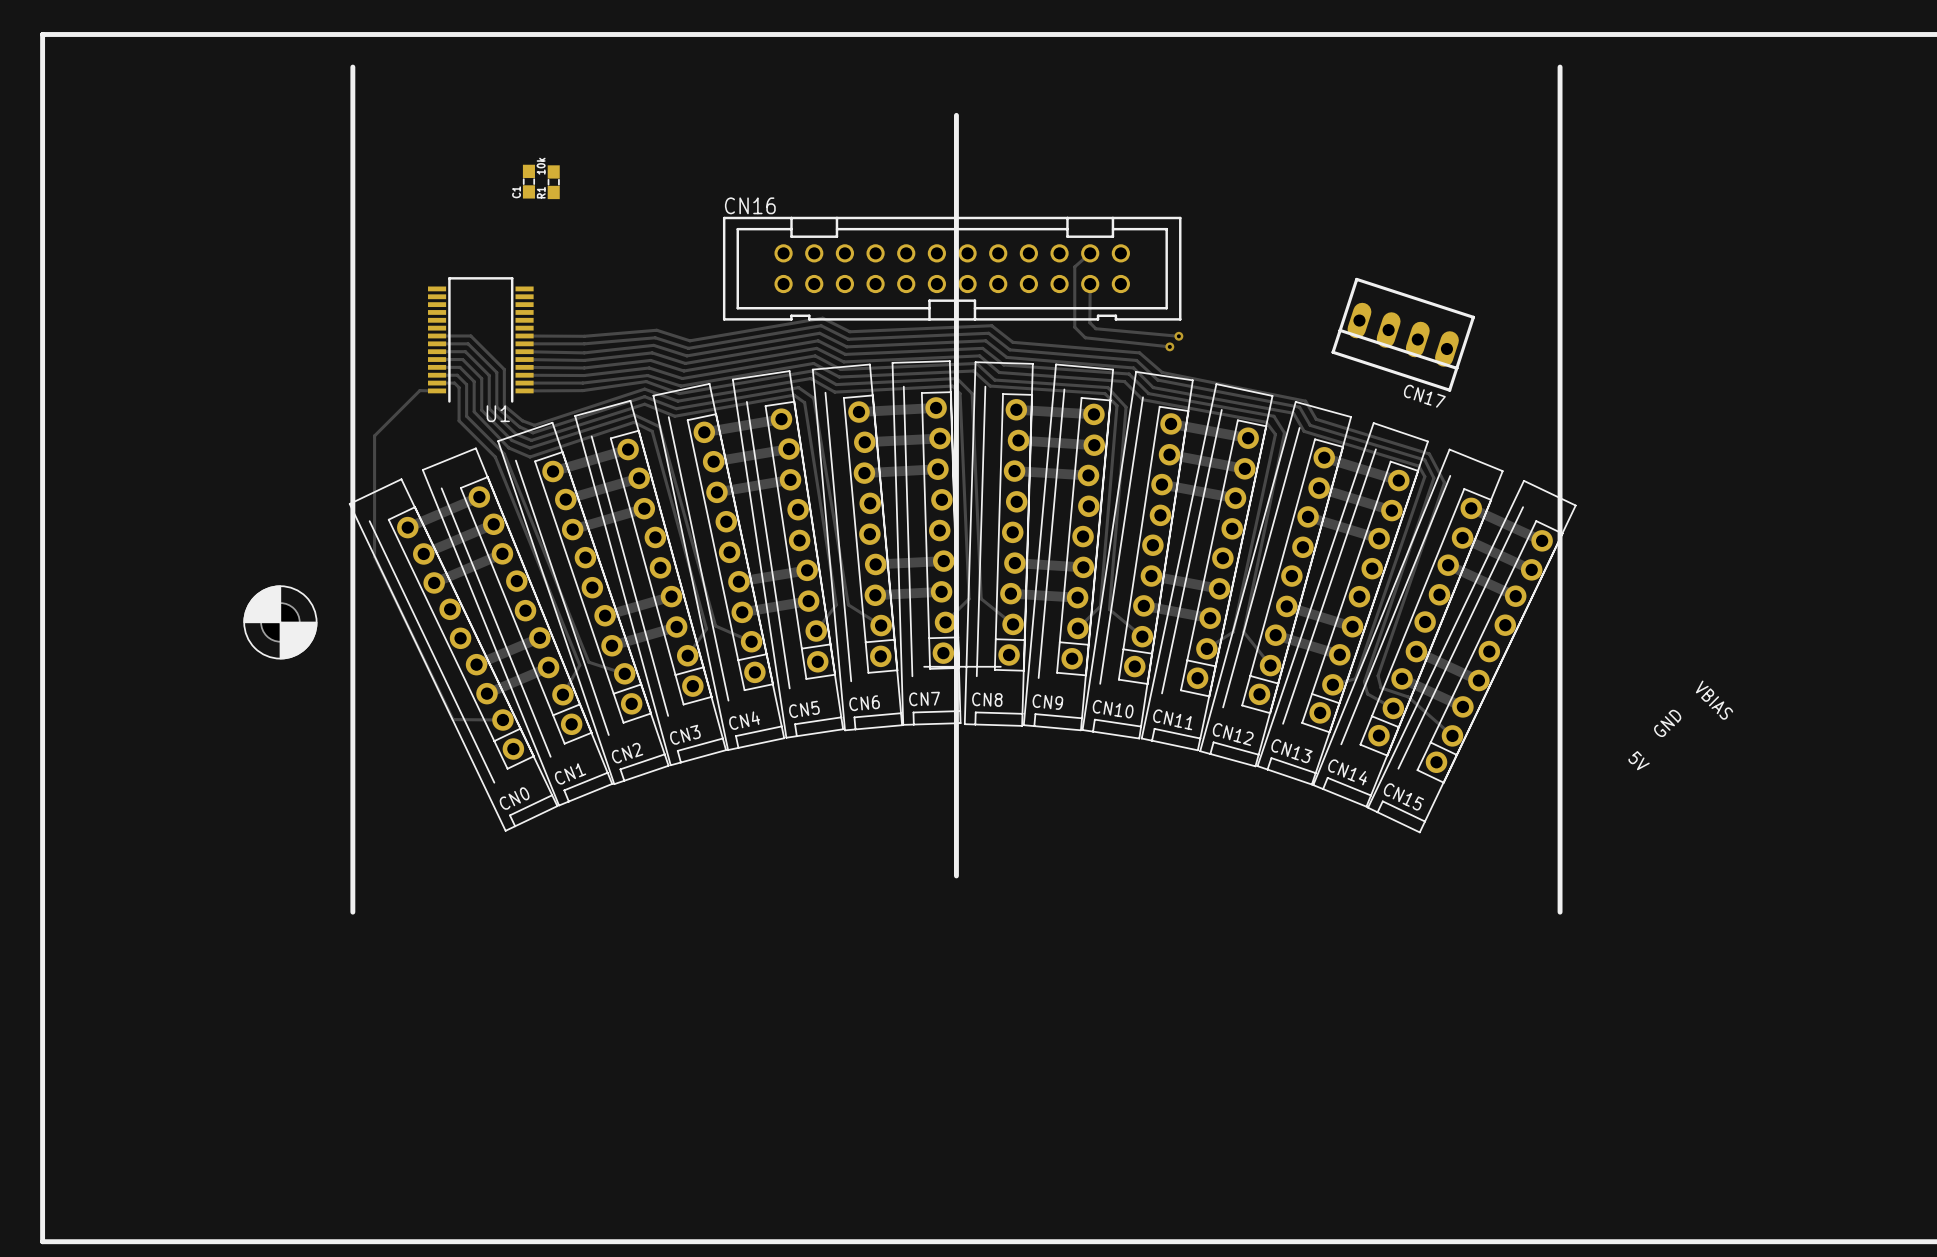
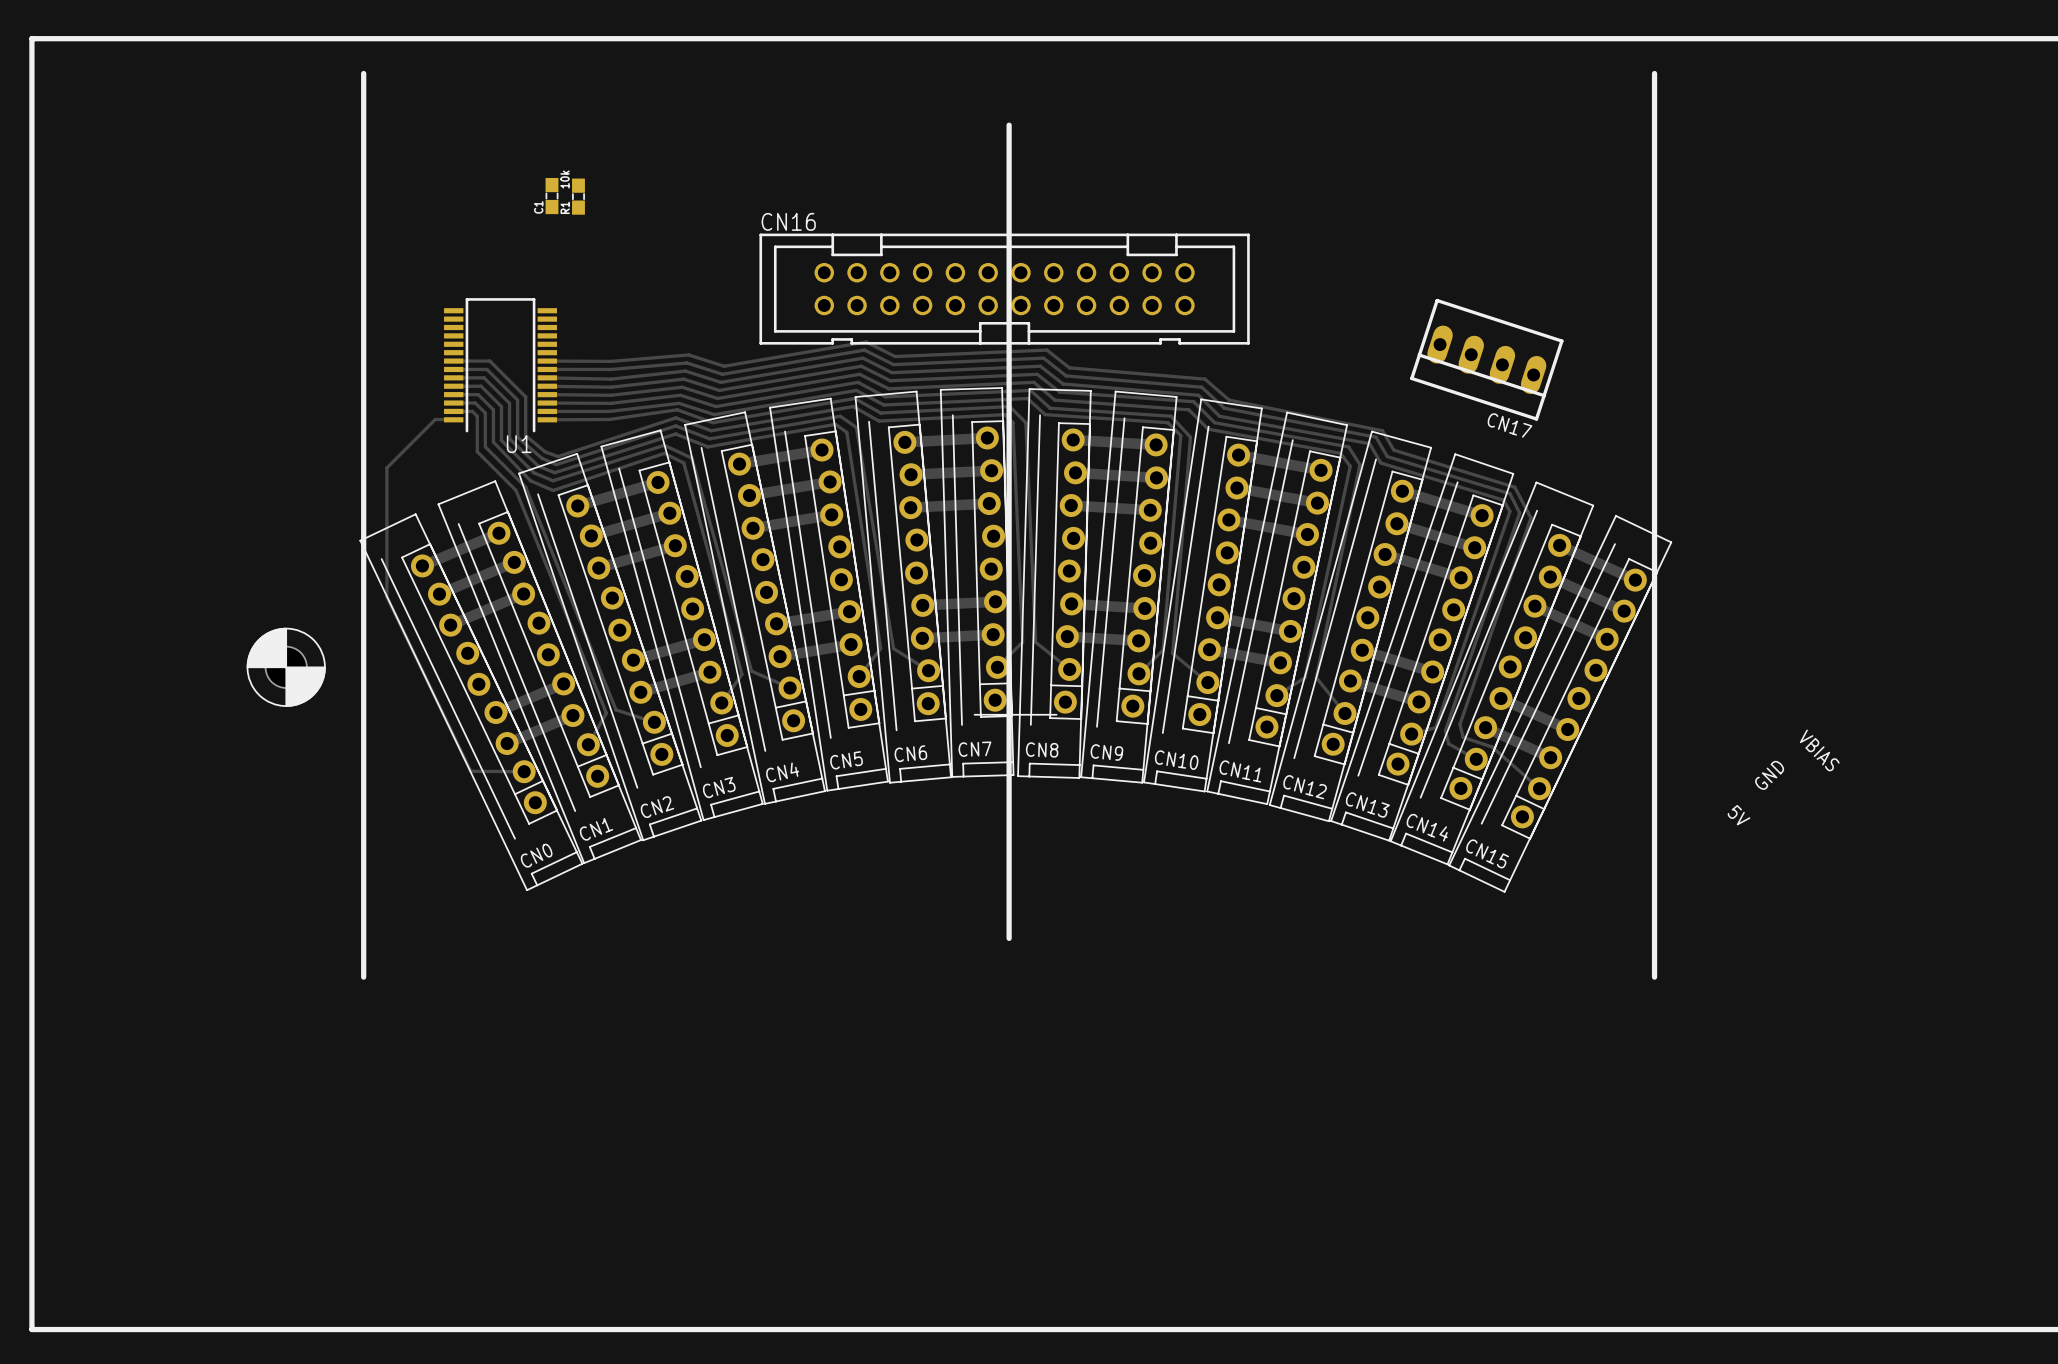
track: (1090, 253) (1074, 266) (1074, 327) (1085, 337) (1169, 346) -> none
track: (1090, 284) (1089, 322) (1095, 328) (1178, 336) -> none
via: (1178, 336) -> none
via: (1169, 346) -> none

